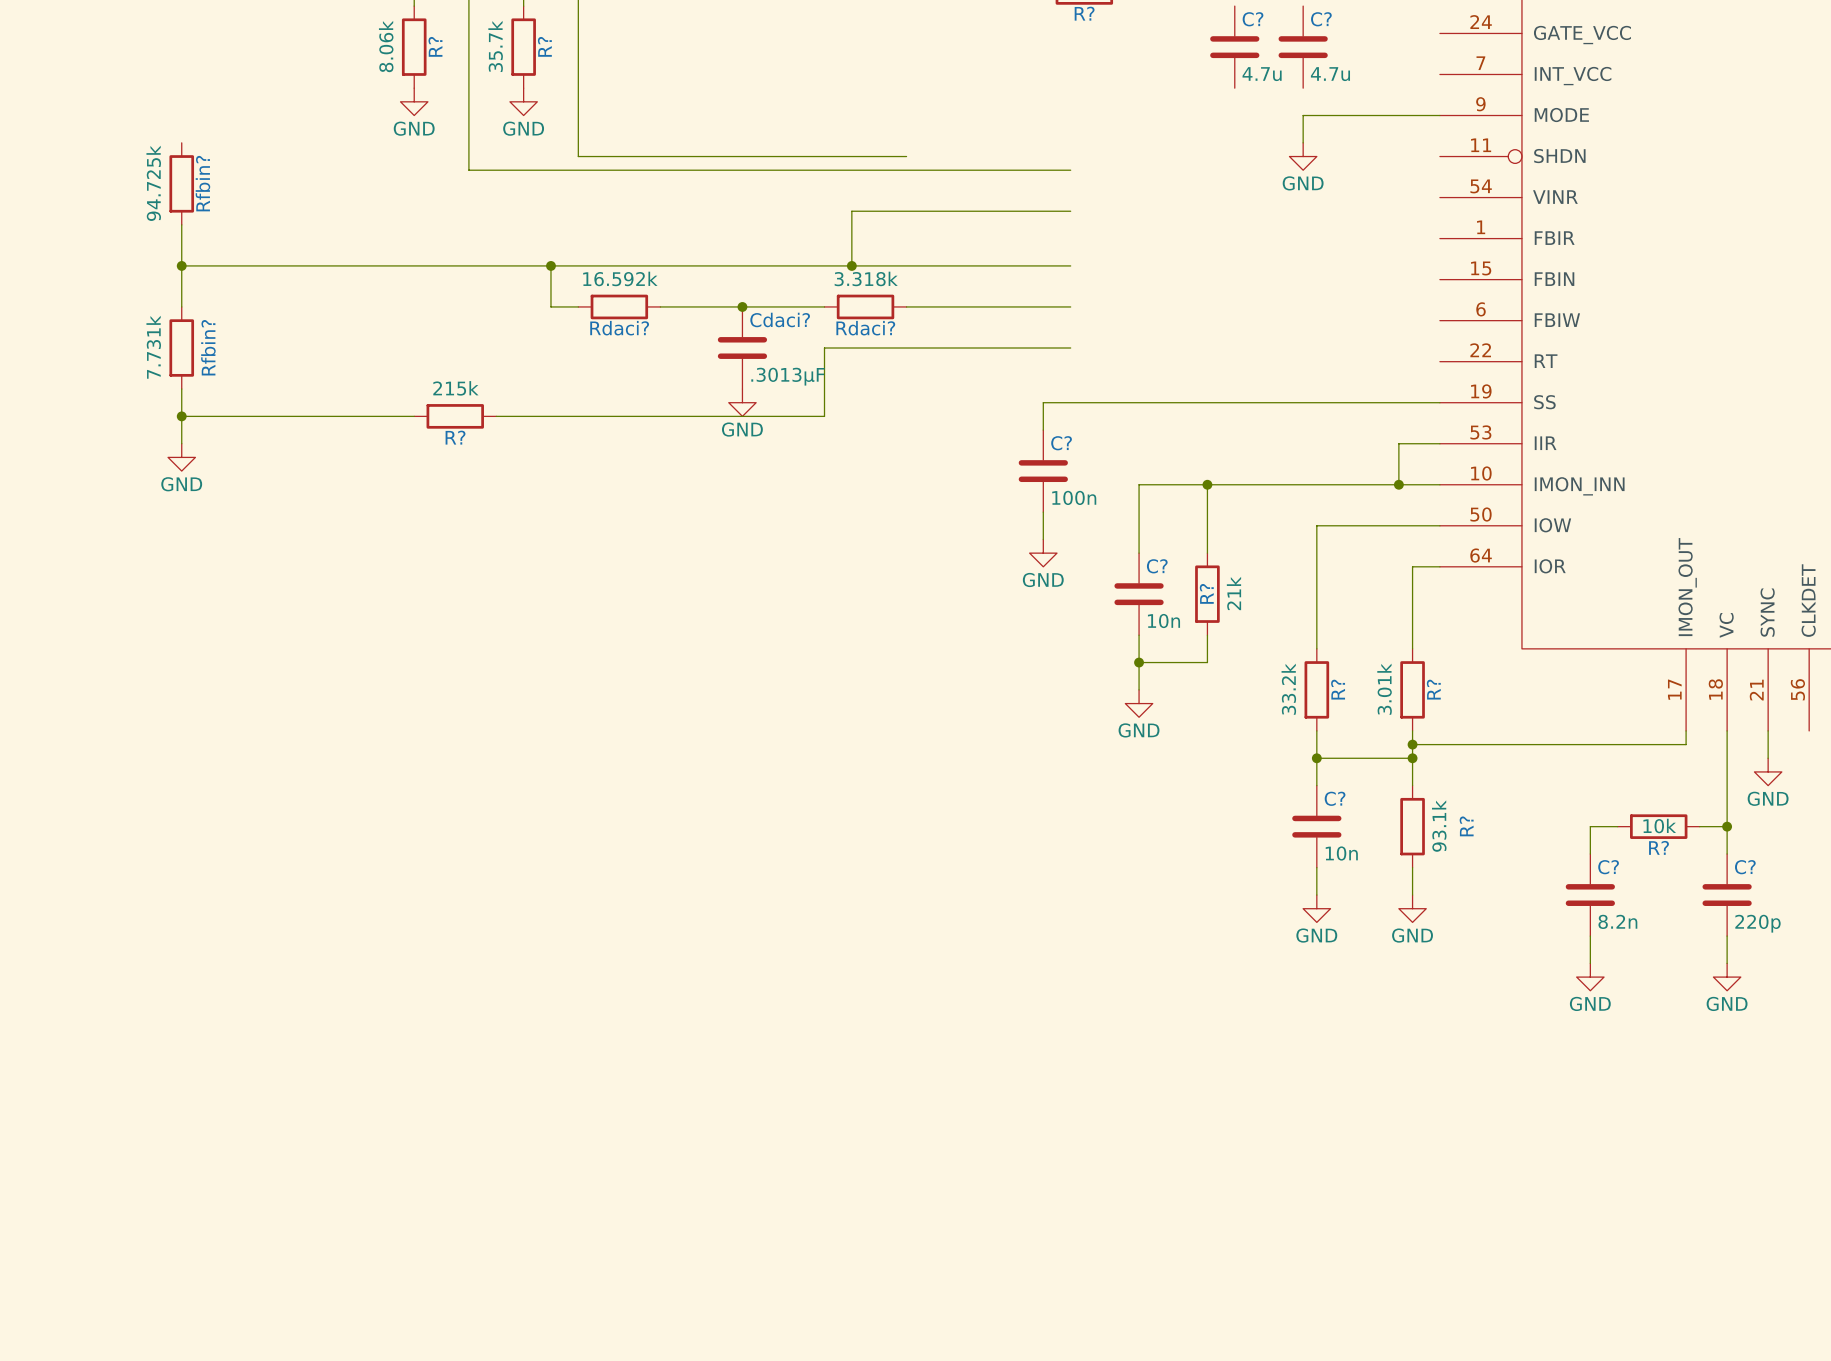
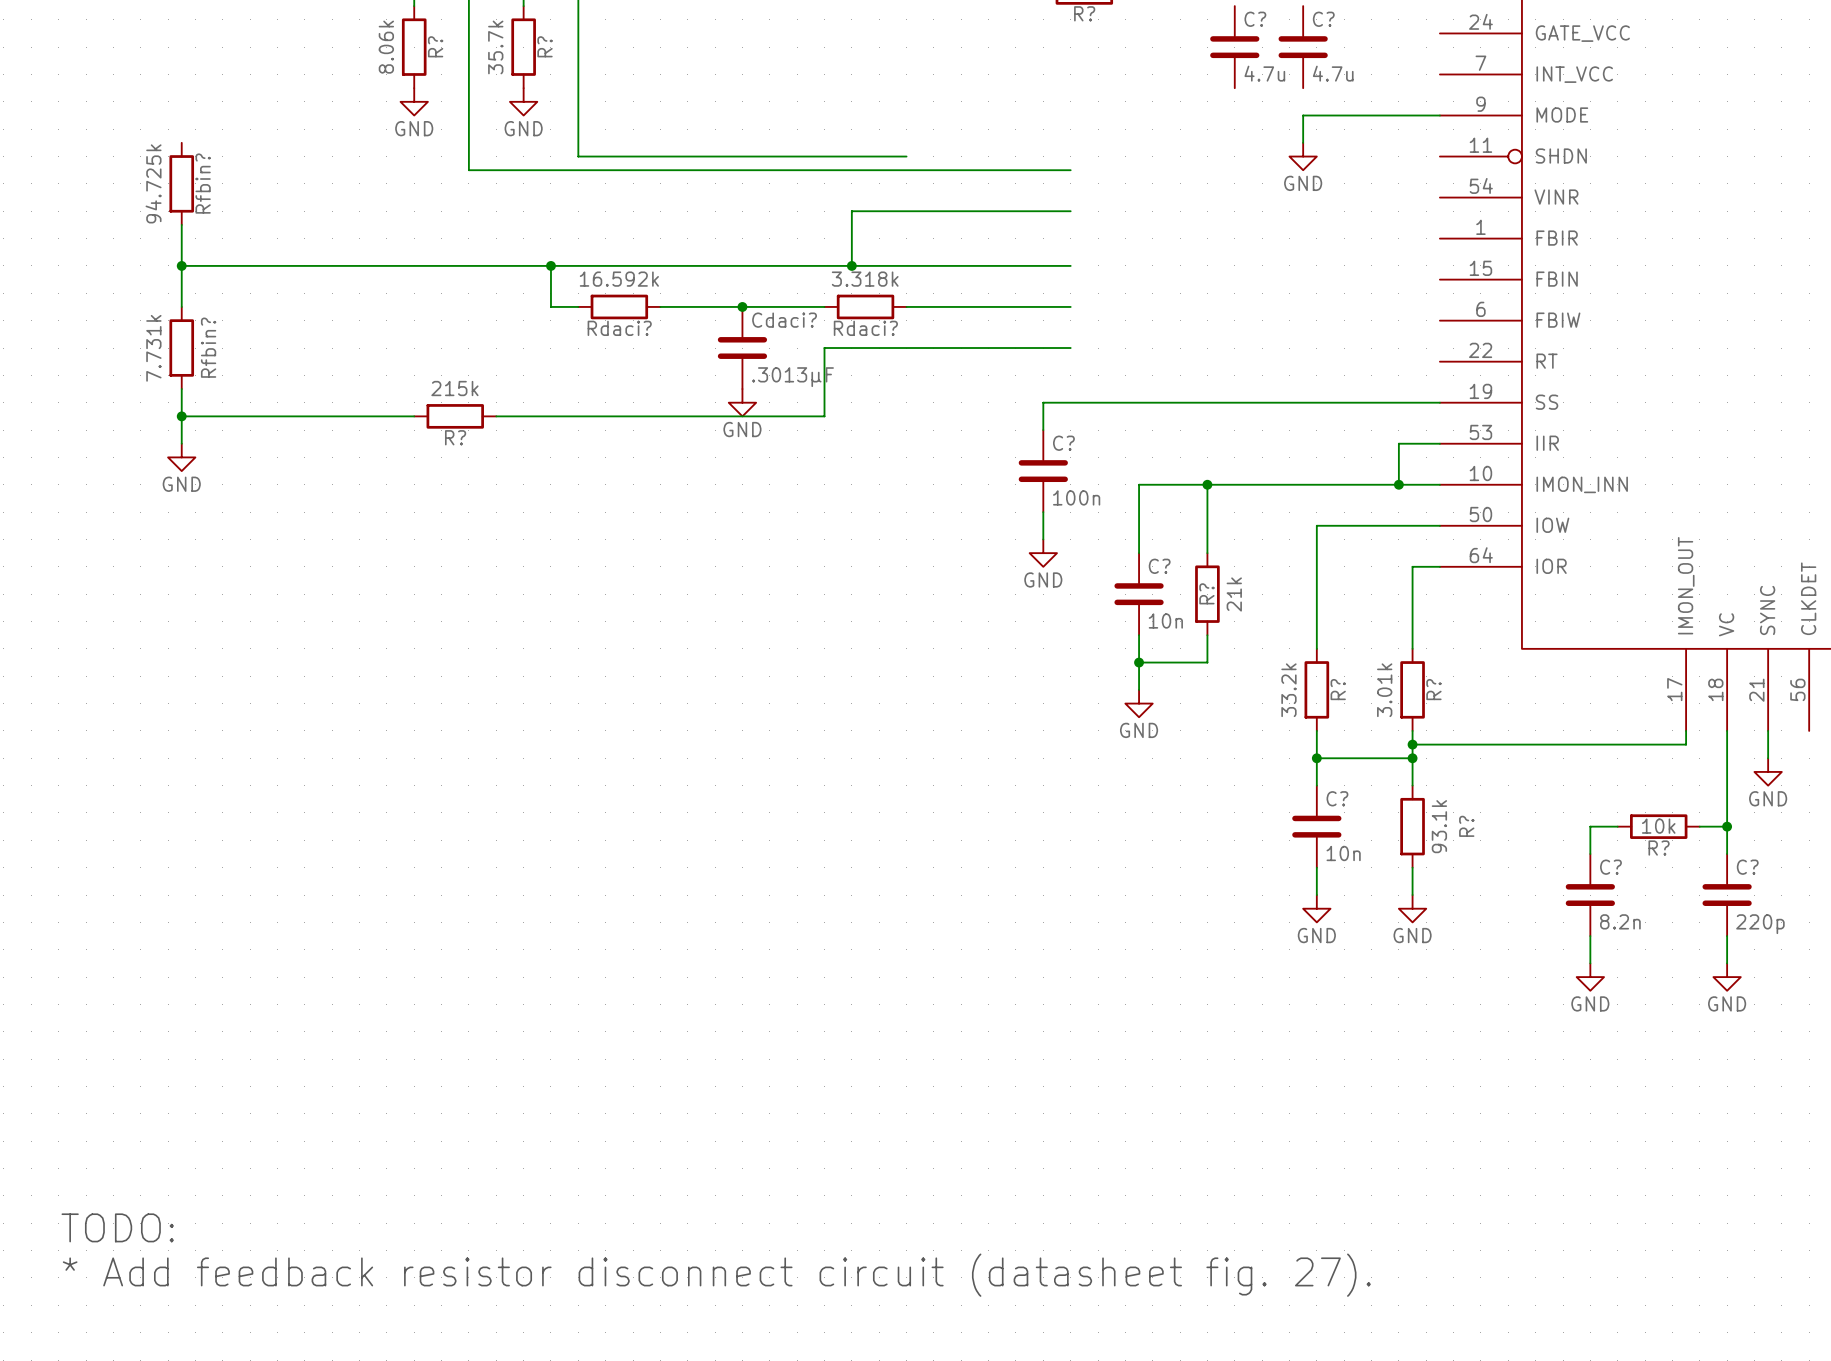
text: none -> TODO: (117, 1227)
text: none -> * Add feedback resistor disconnect circuit (datasheet fig. 27). (716, 1275)

